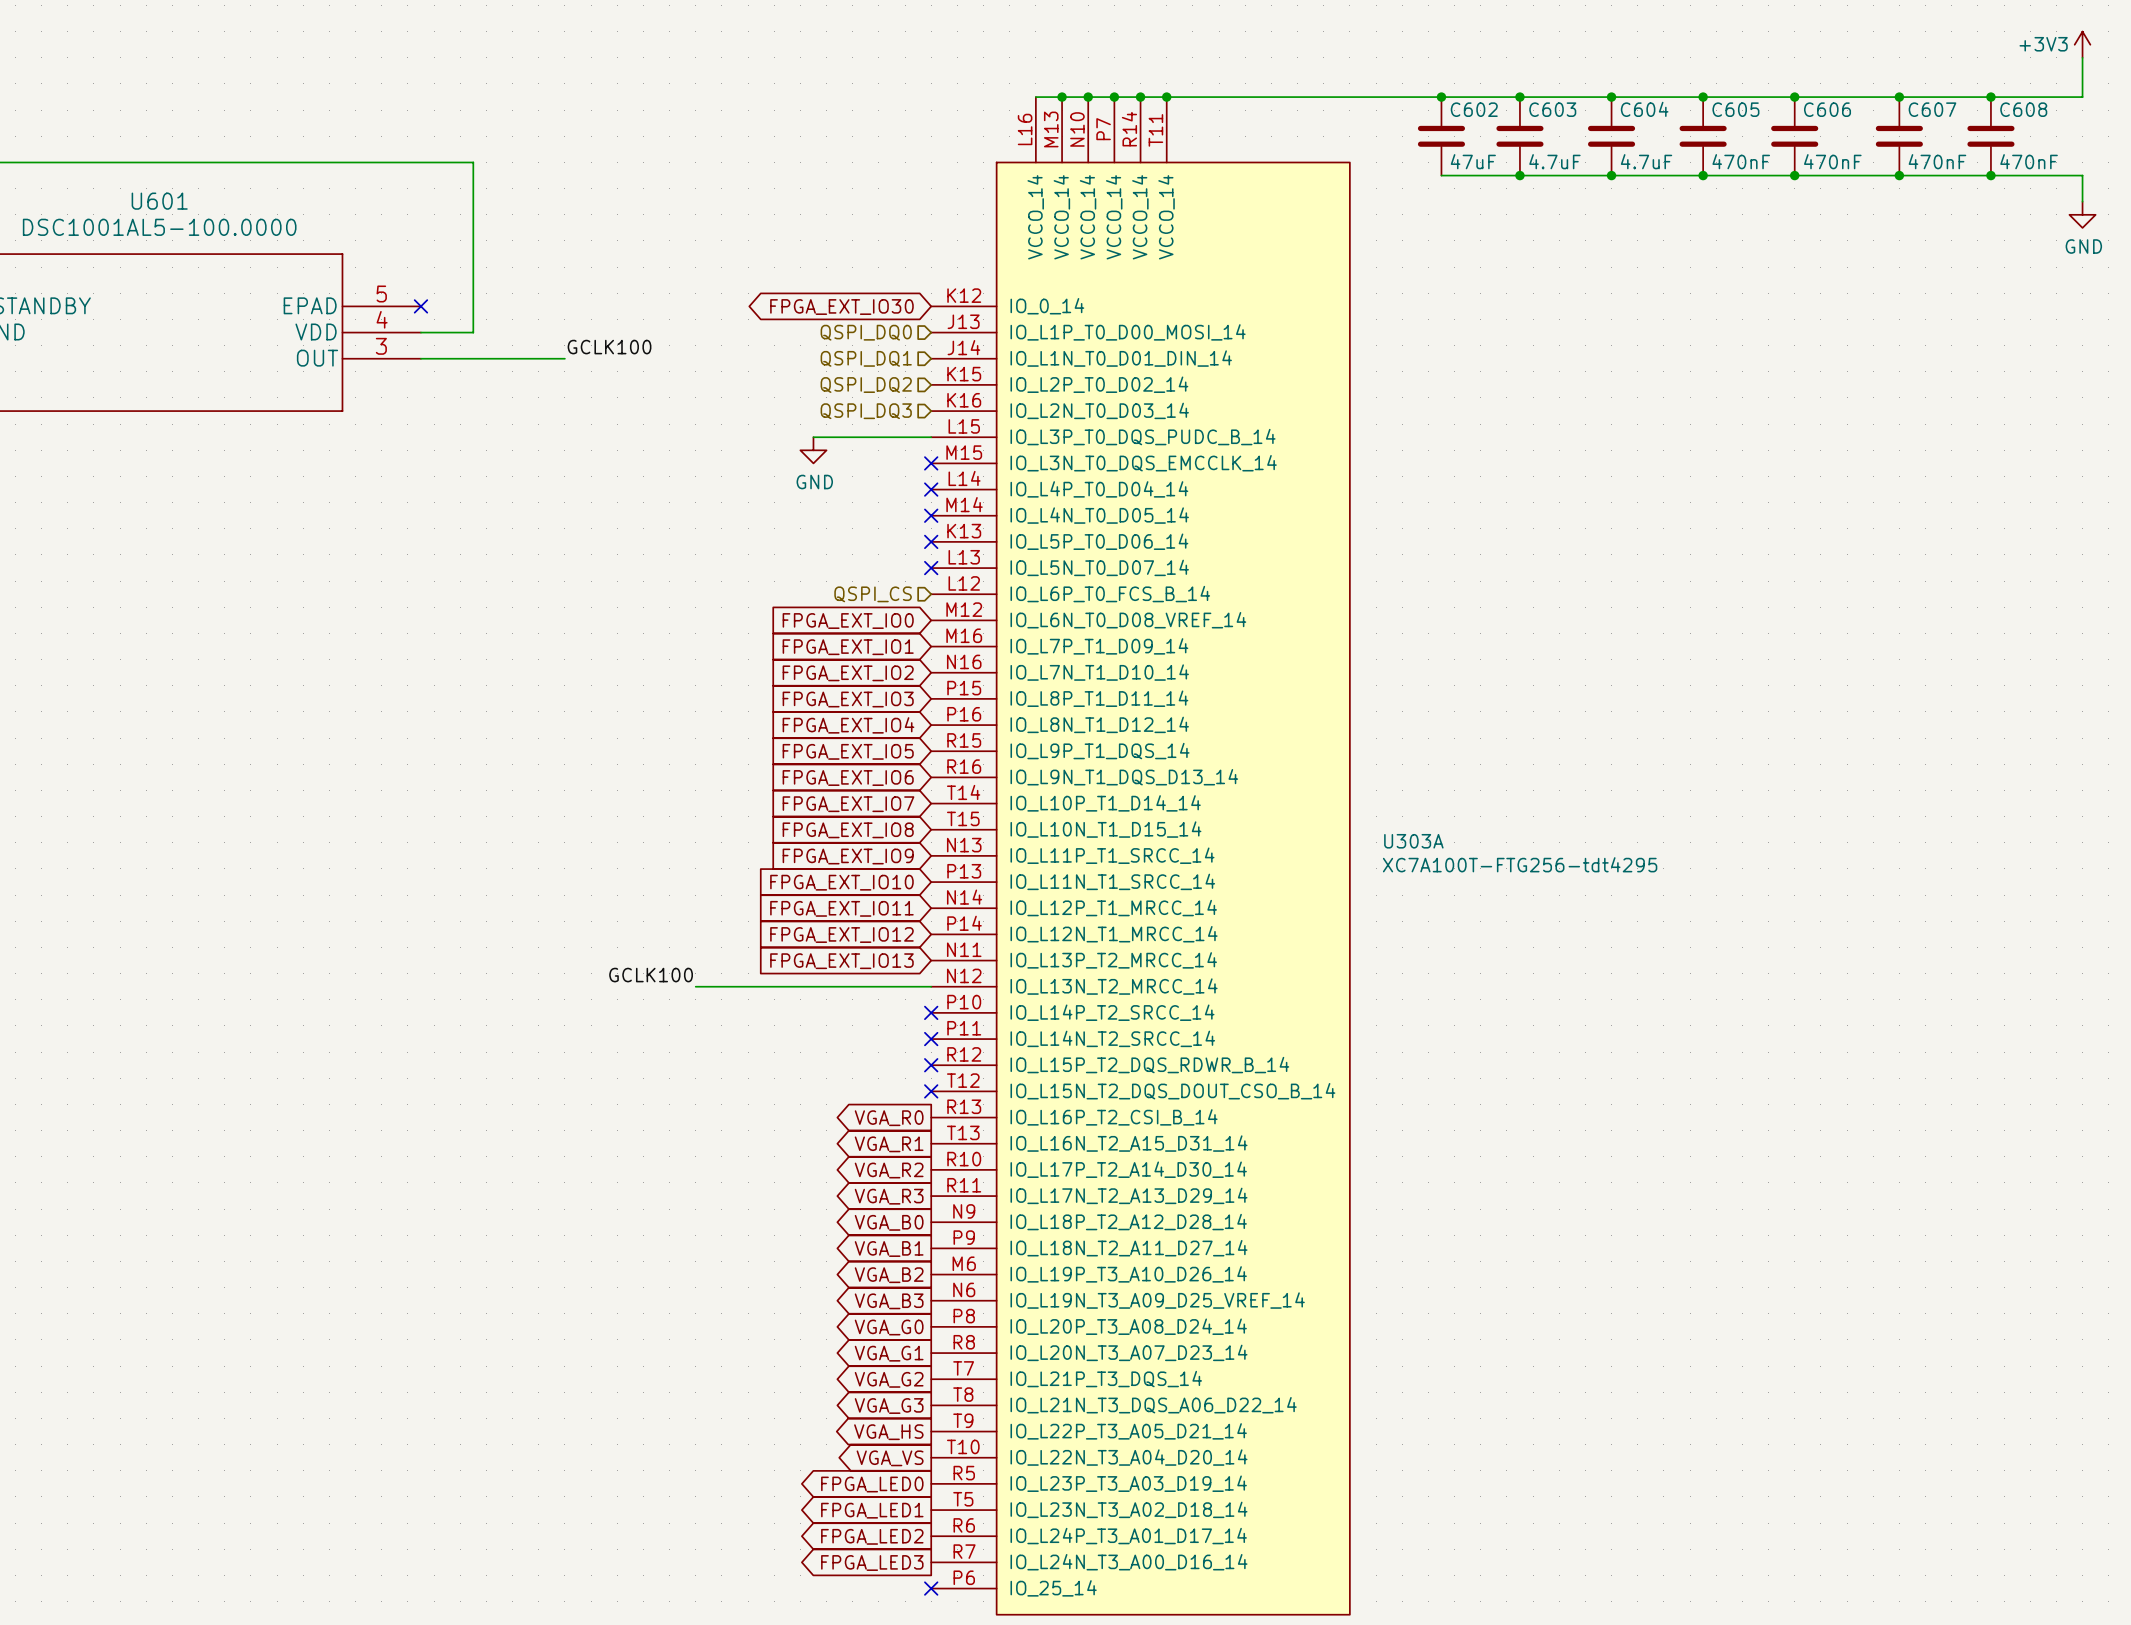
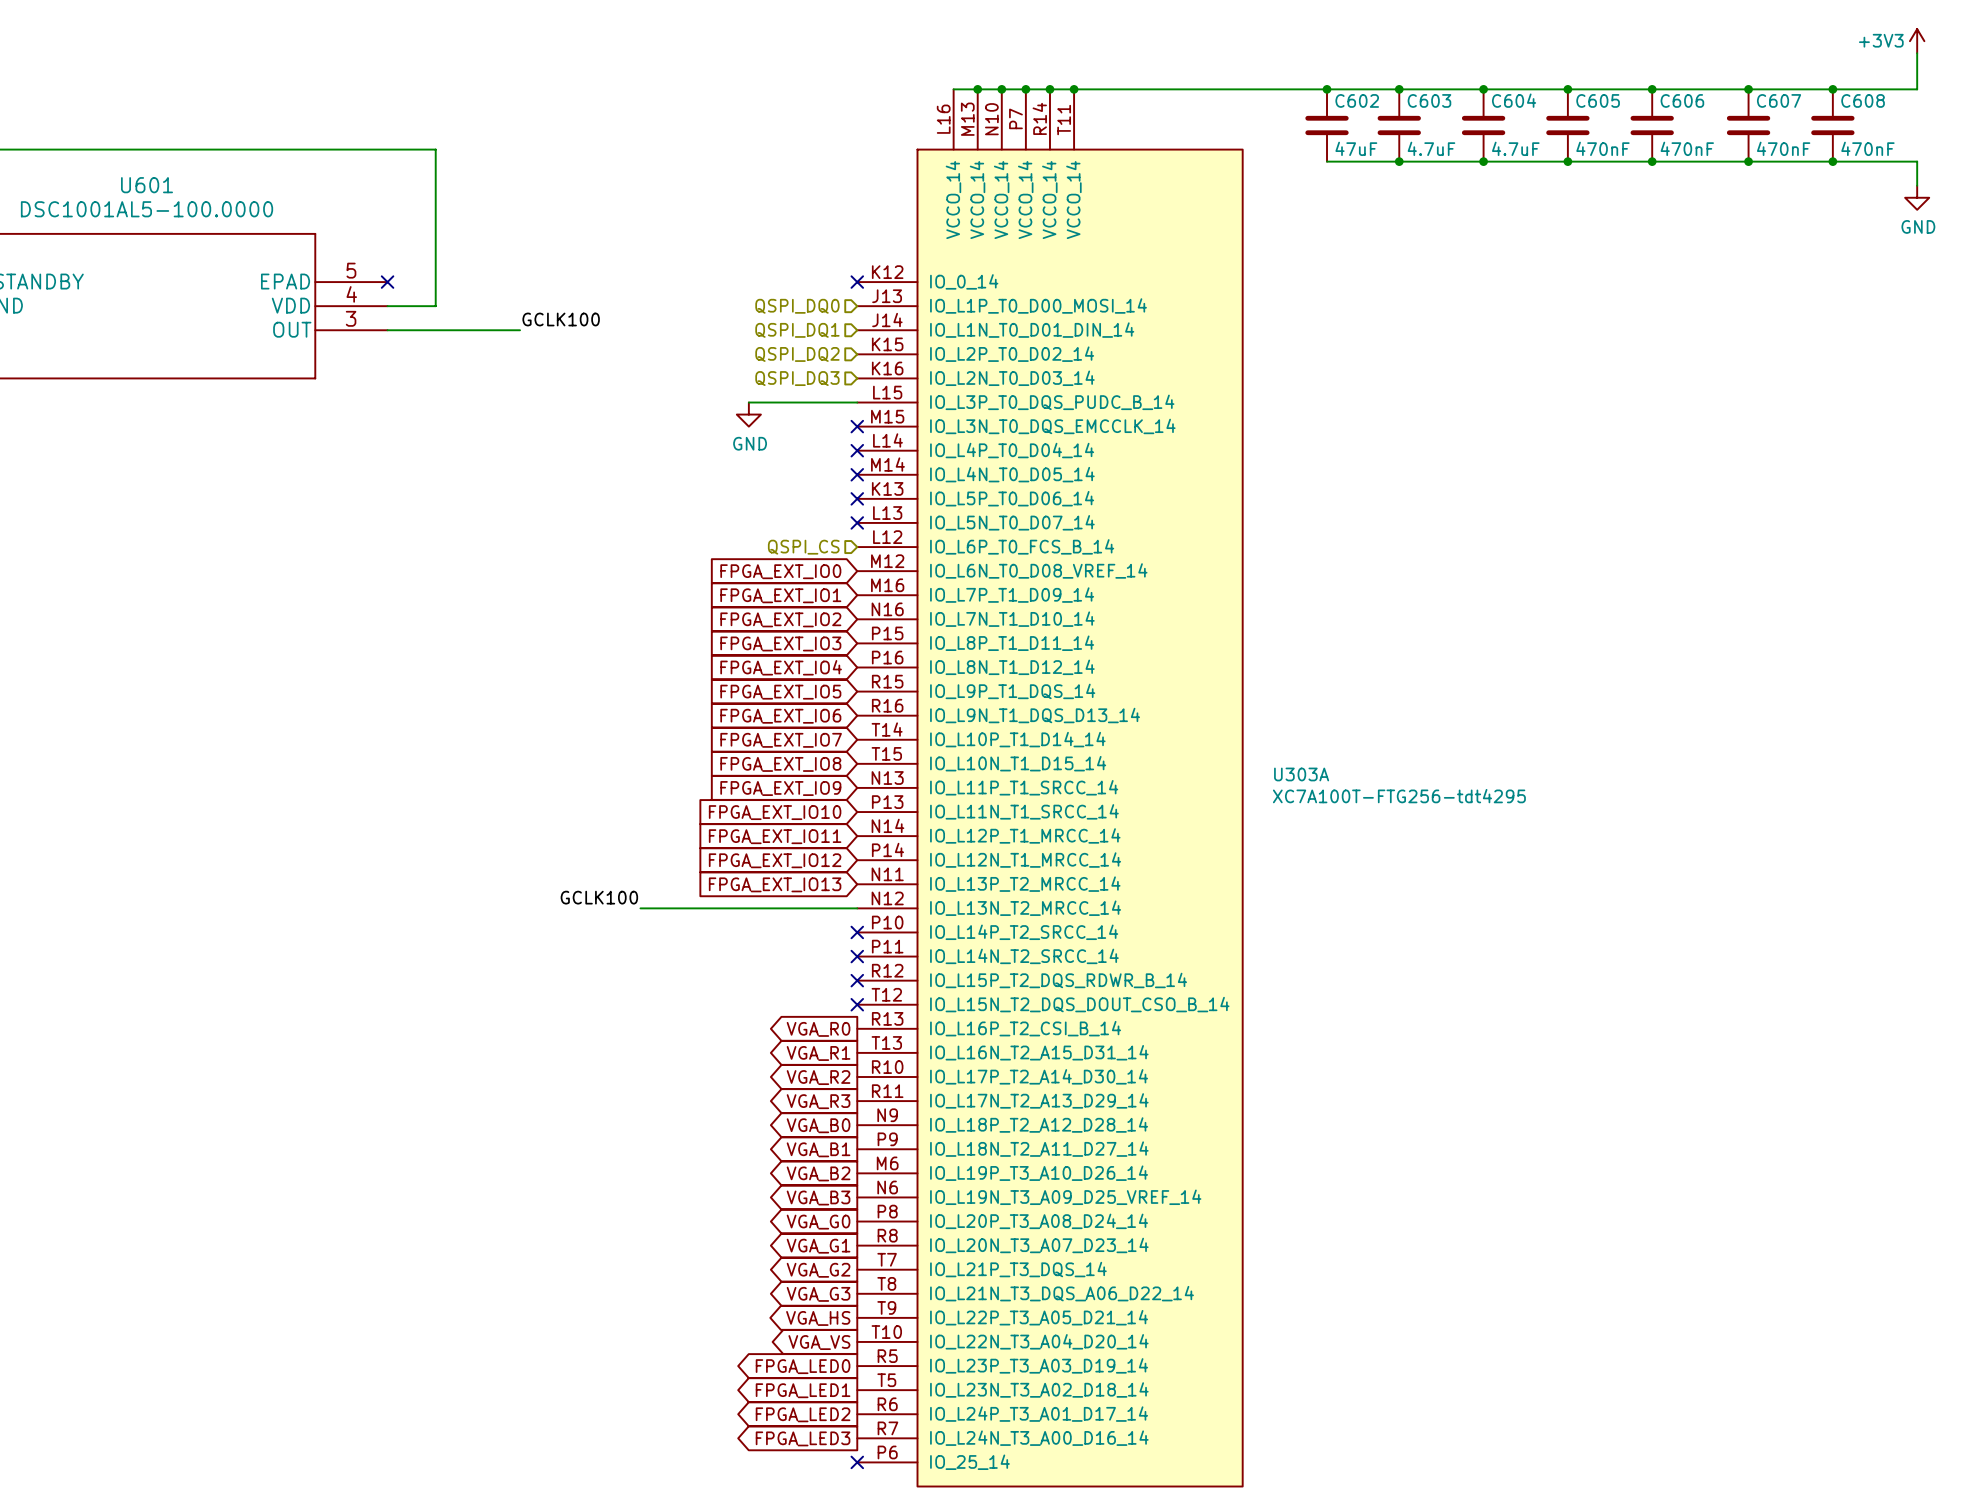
no-connect mark: none -> (857, 282)
global label: FPGA_EXT_IO30 (841, 307) -> none

